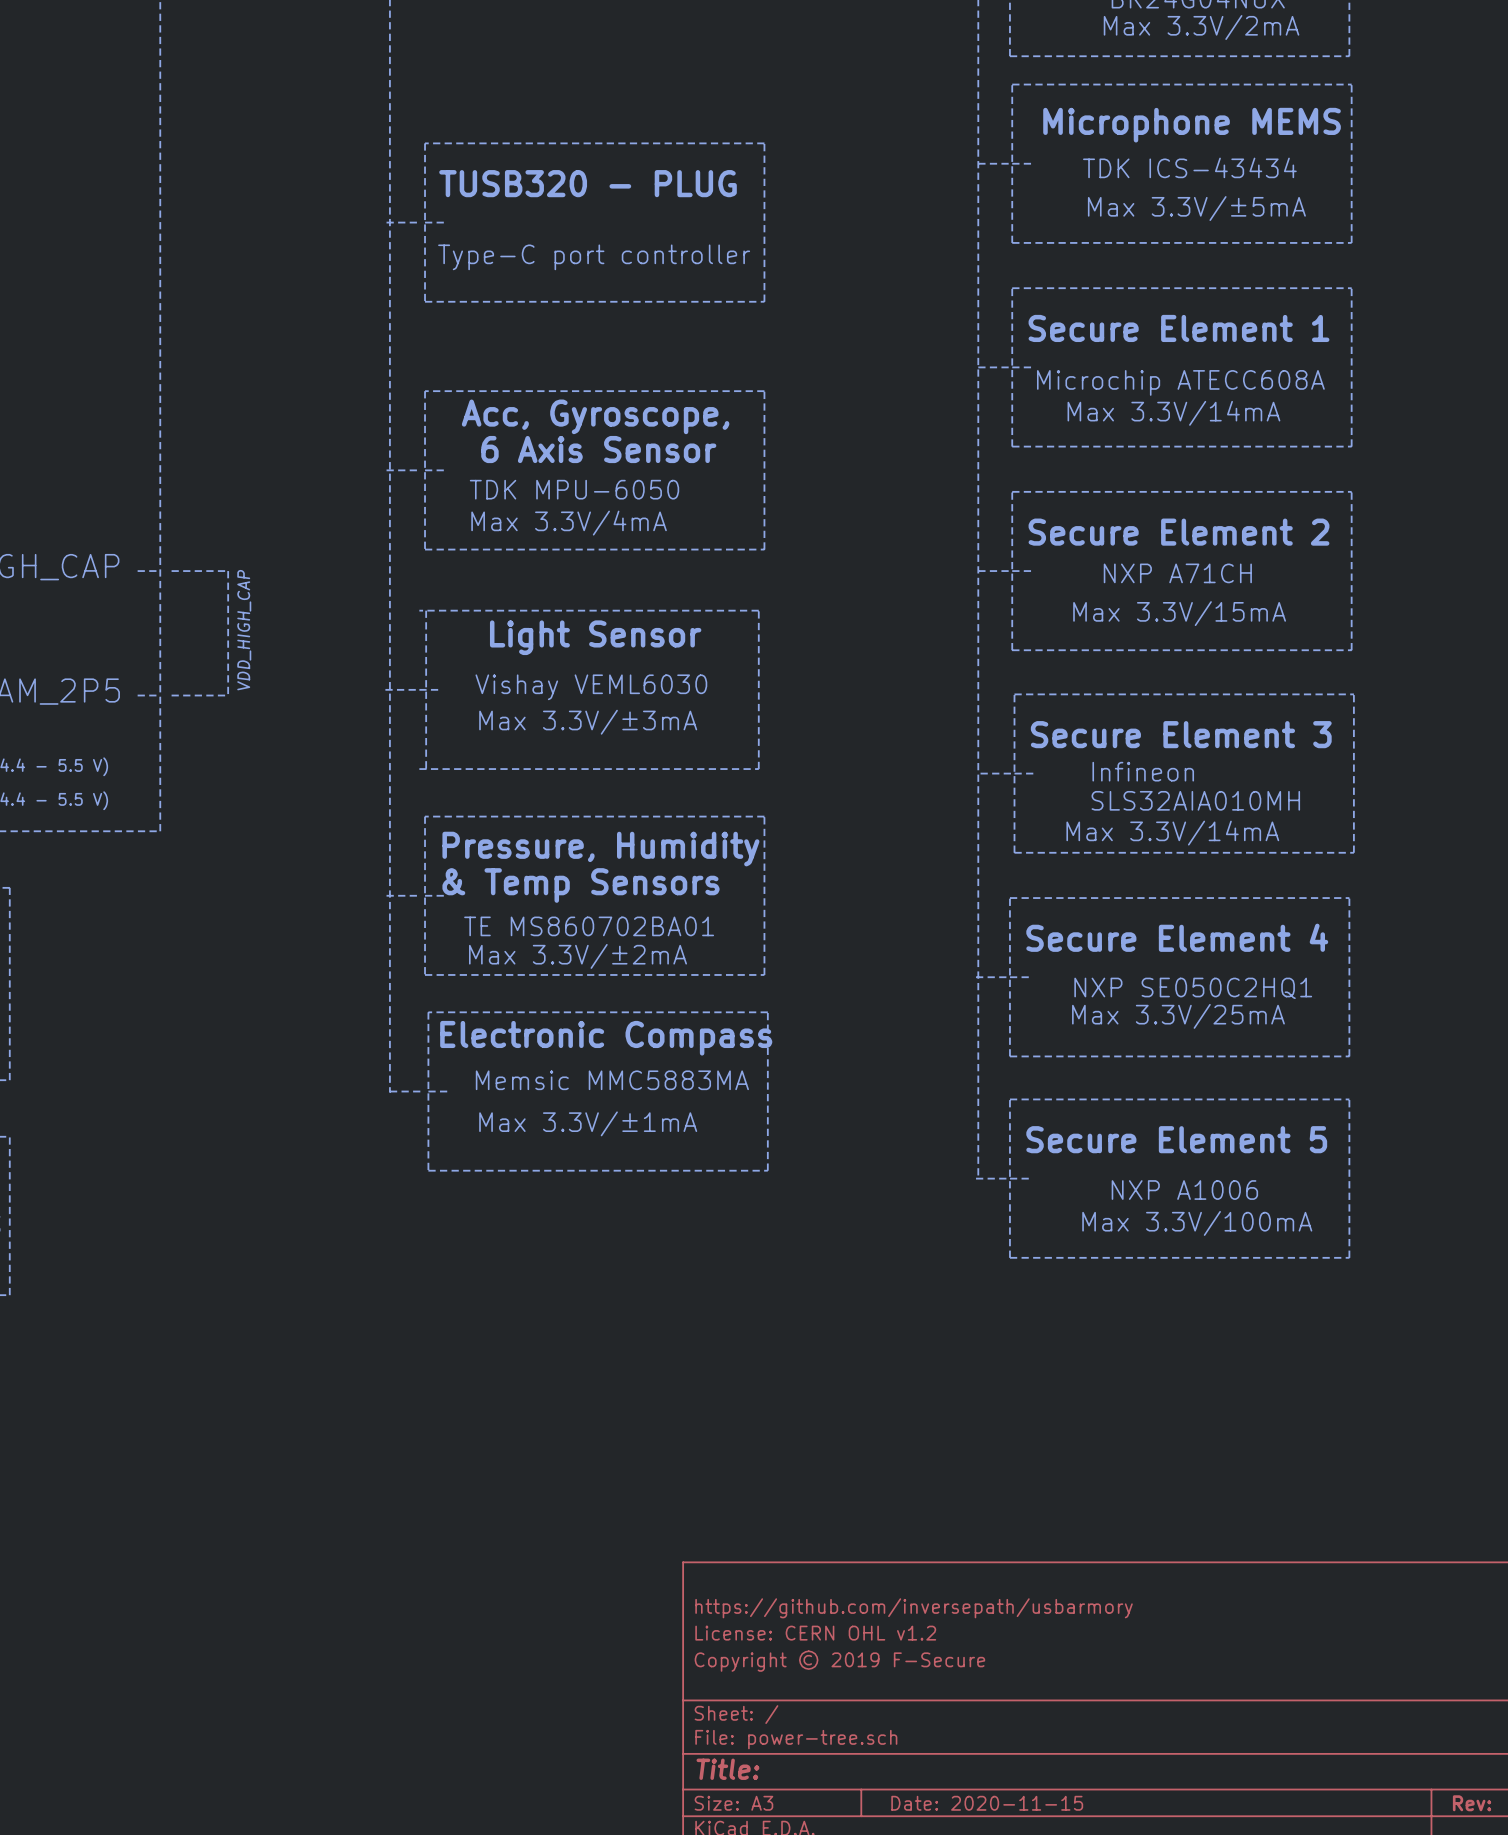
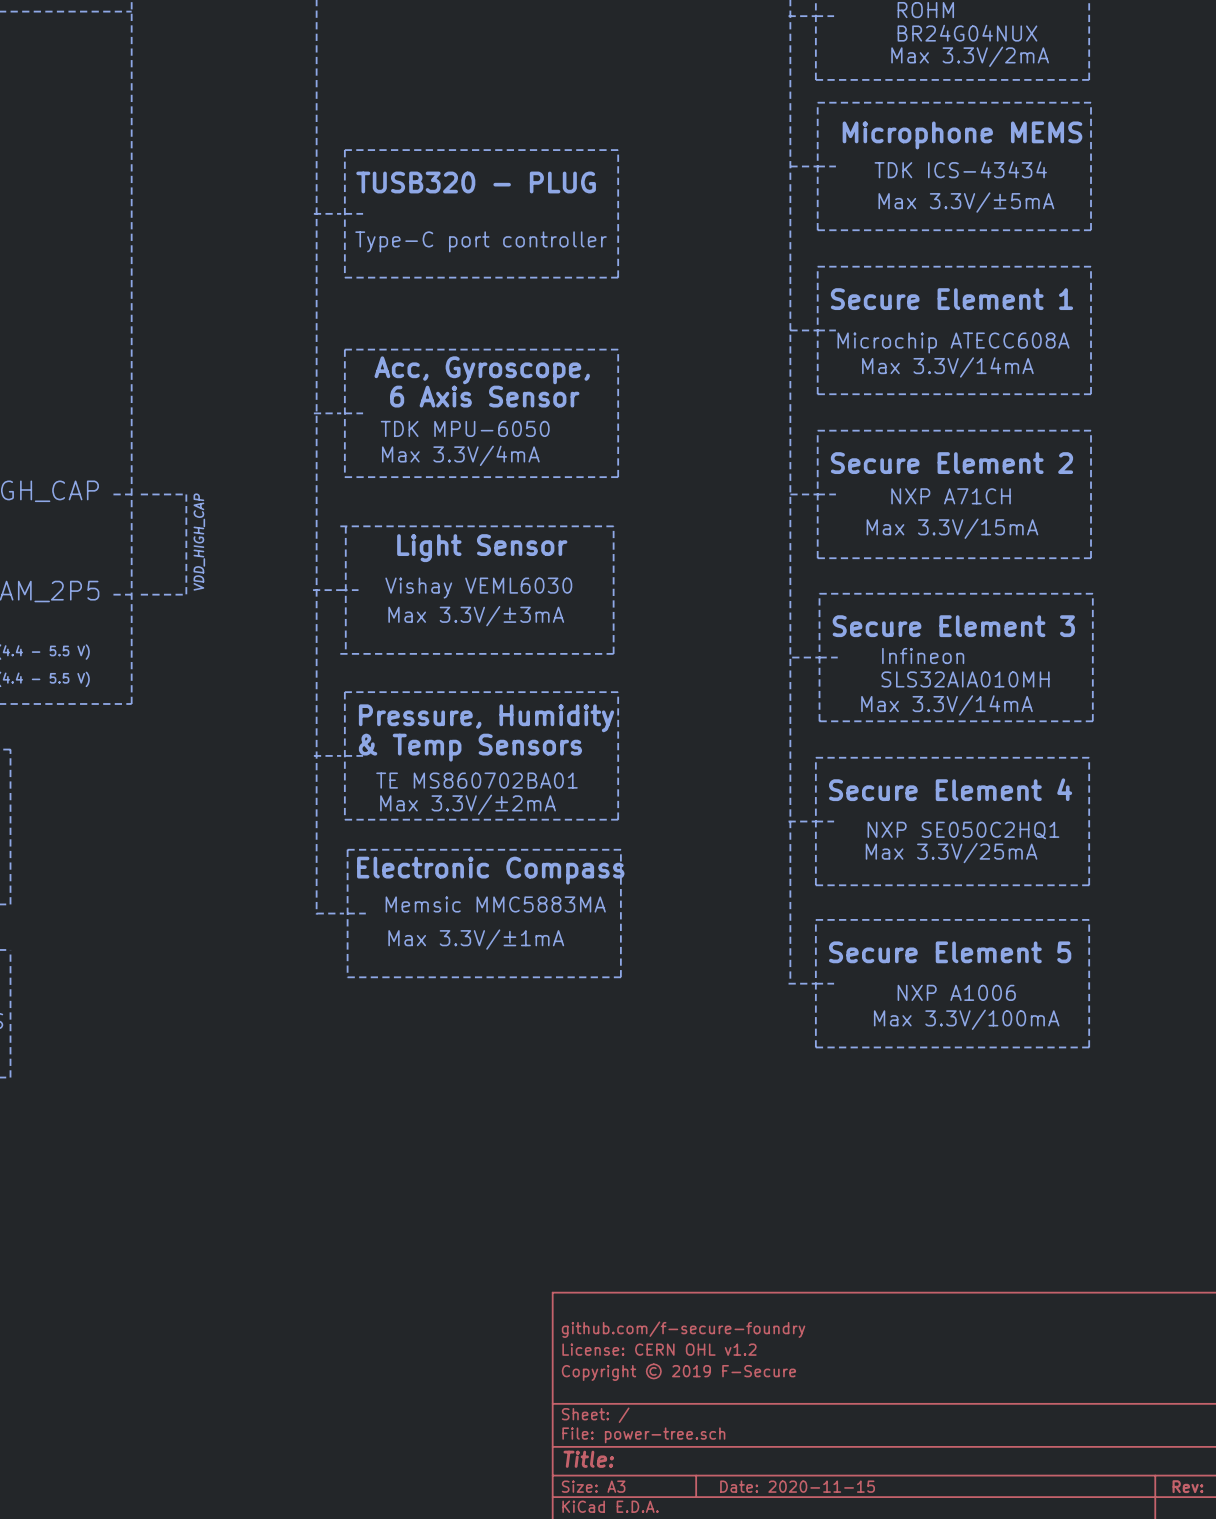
title block: https://github.com/inversepath/usbarmory (914, 1608) -> github.com/f-secure-foundry (683, 1329)

